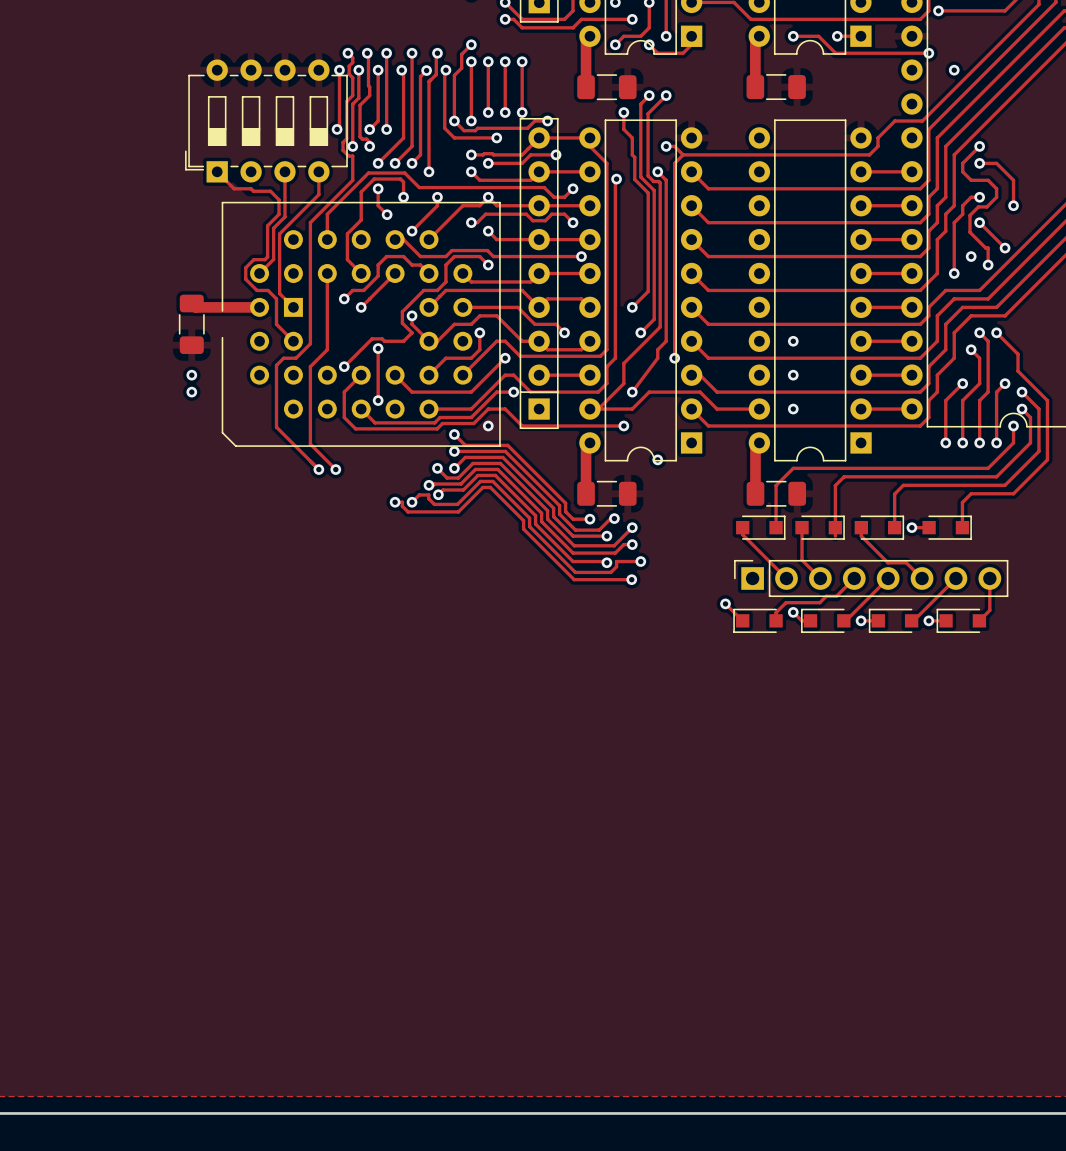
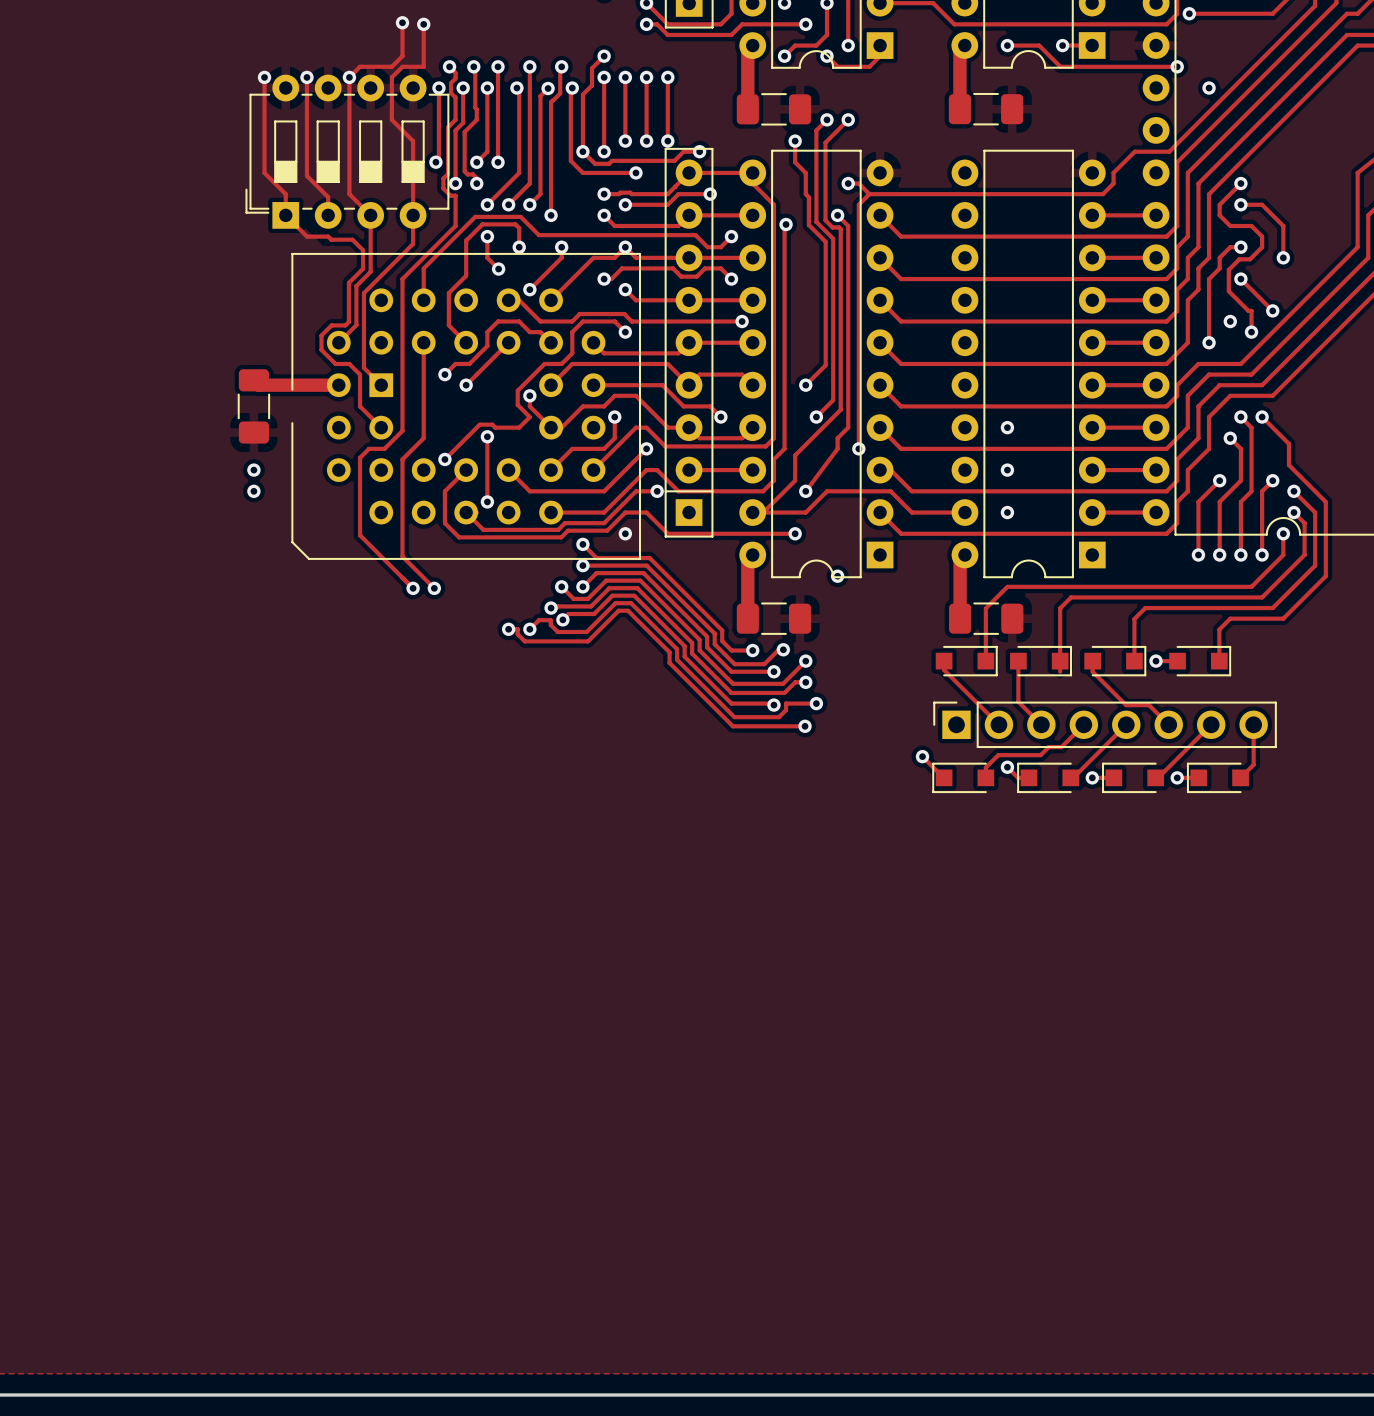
track: none -> (402, 22) (402, 56) (391, 66) (360, 66) (349, 77) (349, 194) (370, 215)
via: none -> (402, 22)
track: none -> (423, 24) (423, 66) (402, 66) (391, 77) (391, 119) (413, 141) (413, 215)
via: none -> (423, 24)
track: none -> (264, 77) (264, 172) (285, 194) (285, 215)
via: none -> (264, 77)
track: none -> (306, 77) (306, 175) (328, 197) (328, 215)
via: none -> (306, 77)
via: none -> (349, 77)

